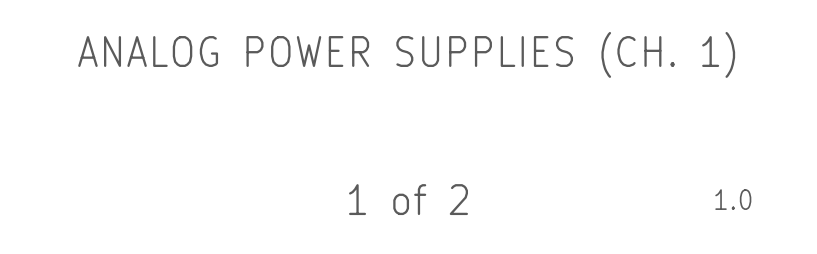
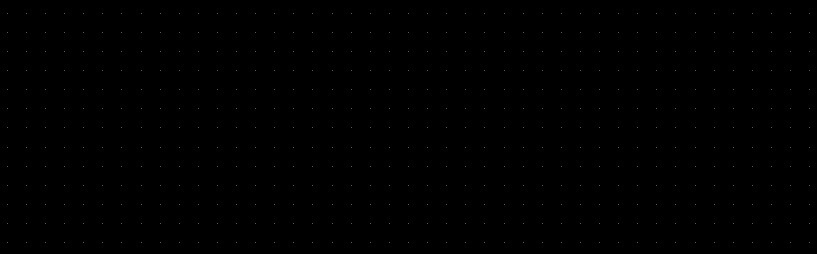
text: ANALOG POWER SUPPLIES (CH. 1) (406, 54) -> none
text: 1 of 2 (408, 199) -> none
text: 1.0 (733, 199) -> none

